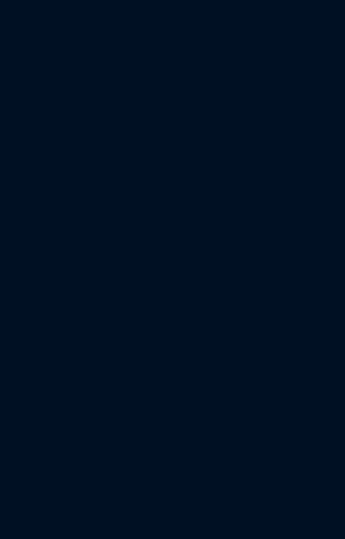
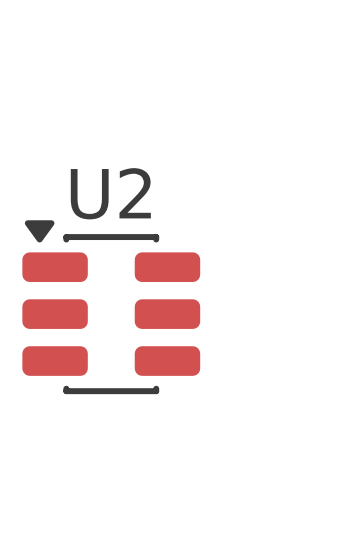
U2: none -> (111, 307)

